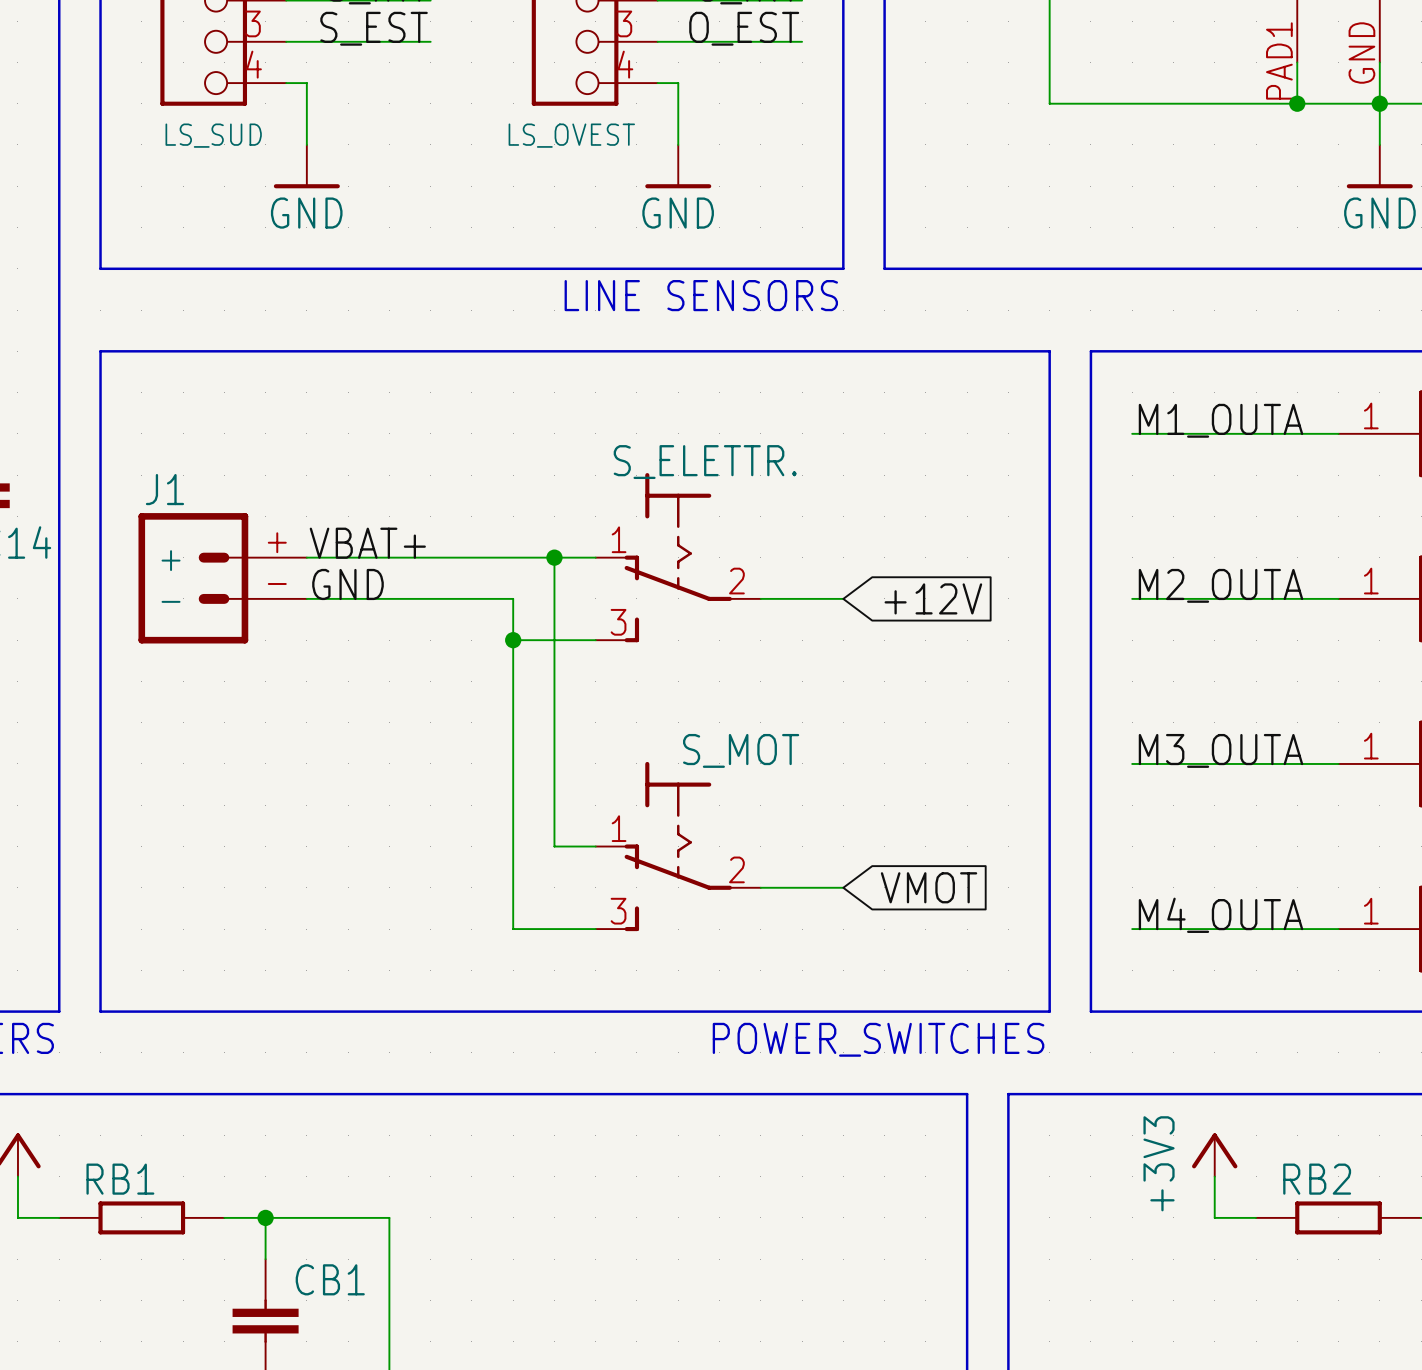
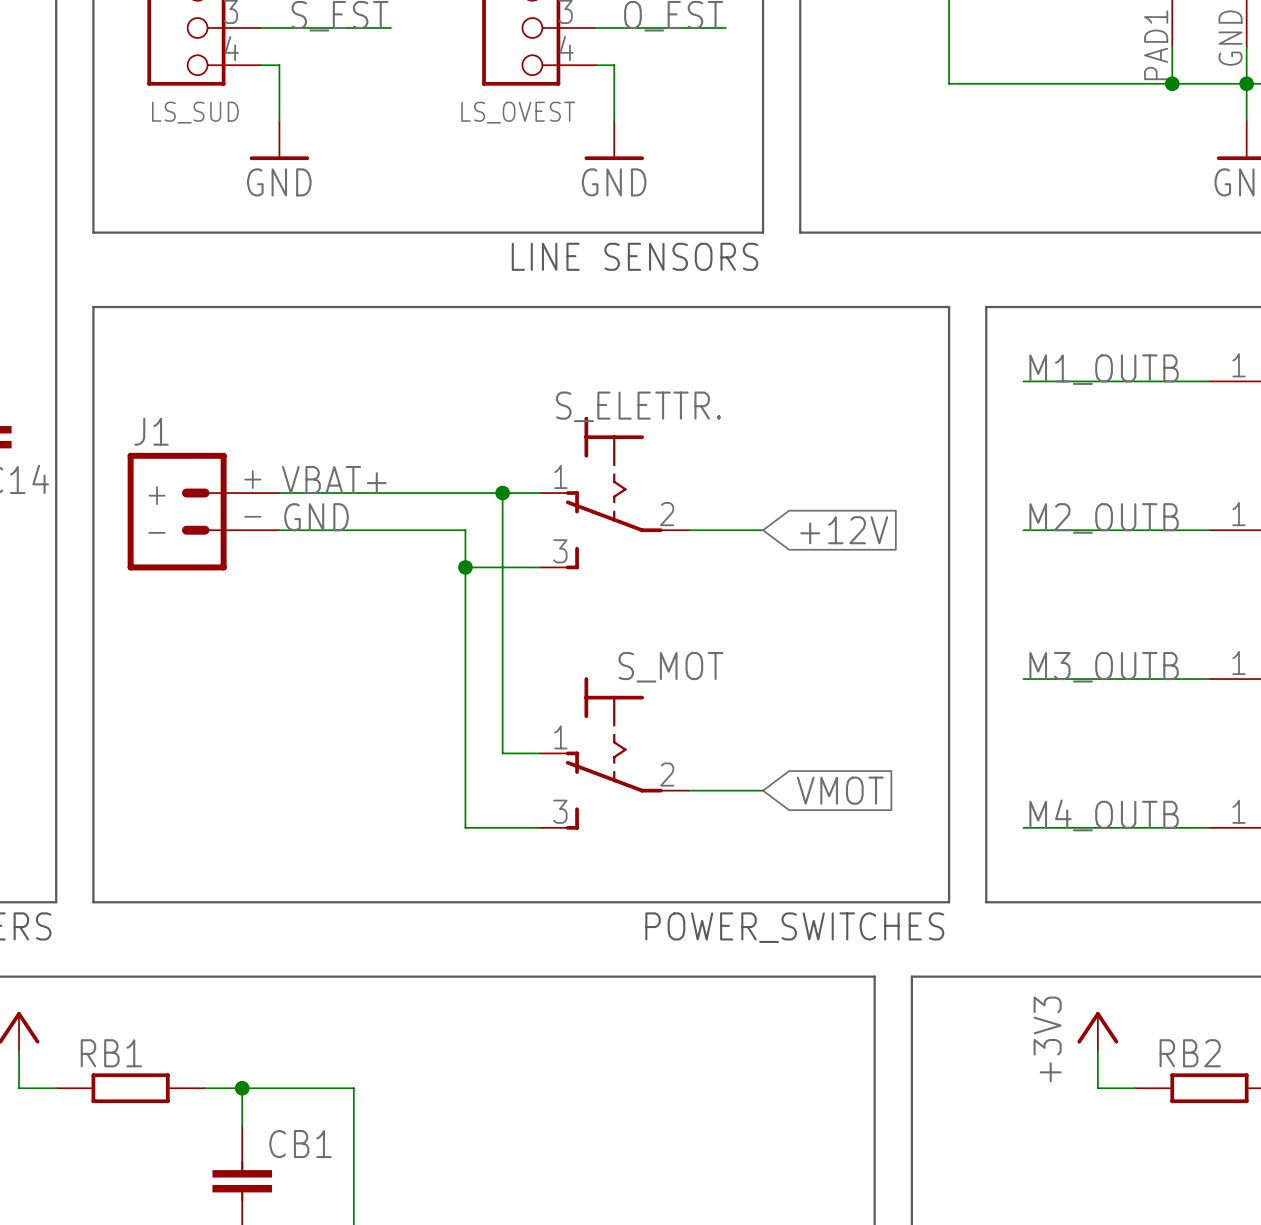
label: M1_OUTA (1221, 420) -> M1_OUTB (1104, 369)
label: M2_OUTA (1221, 585) -> M2_OUTB (1104, 518)
label: M3_OUTA (1221, 750) -> M3_OUTB (1104, 667)
label: M4_OUTA (1221, 915) -> M4_OUTB (1104, 815)

